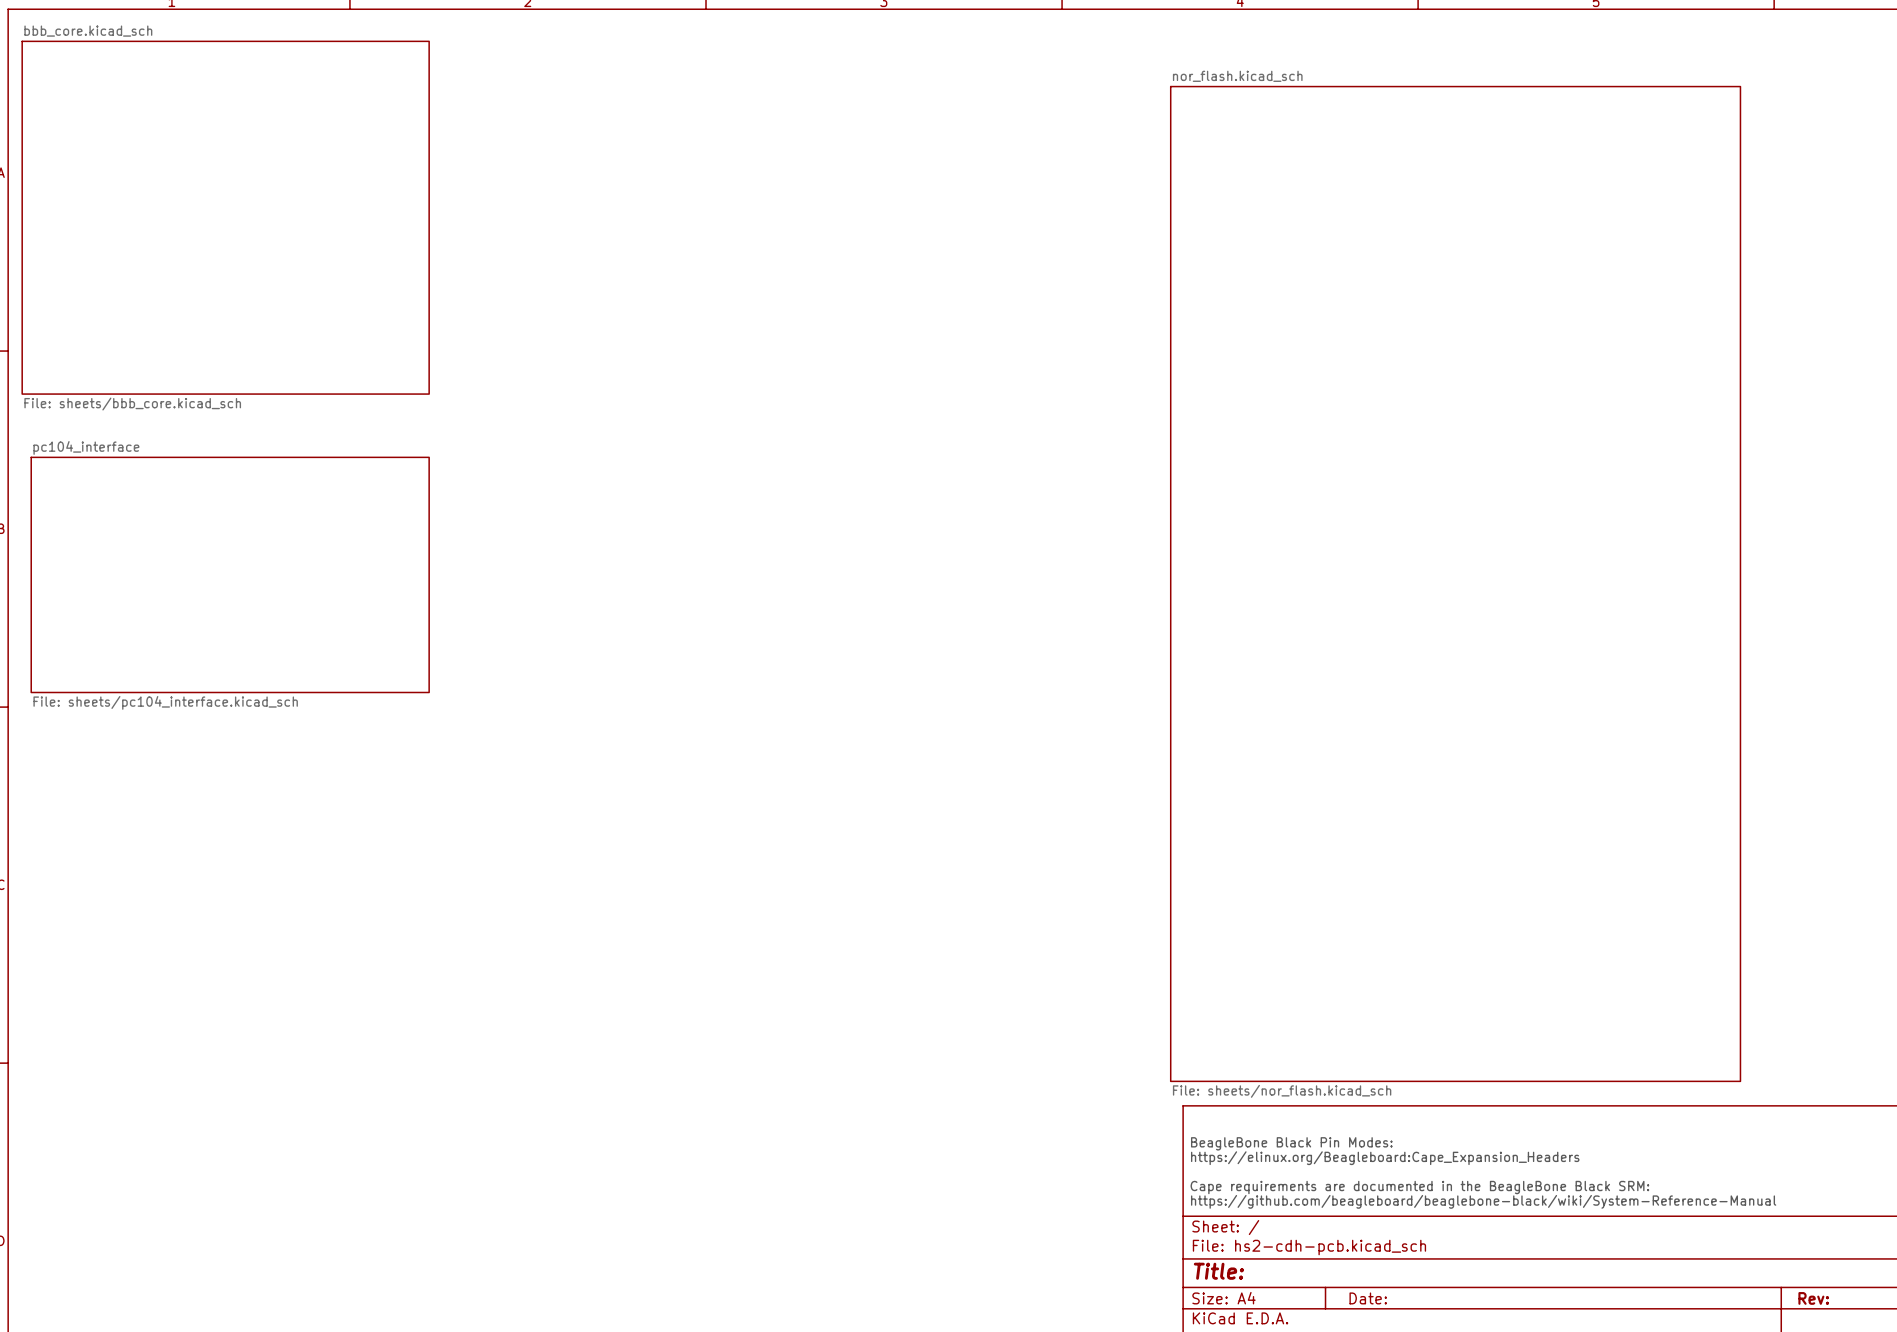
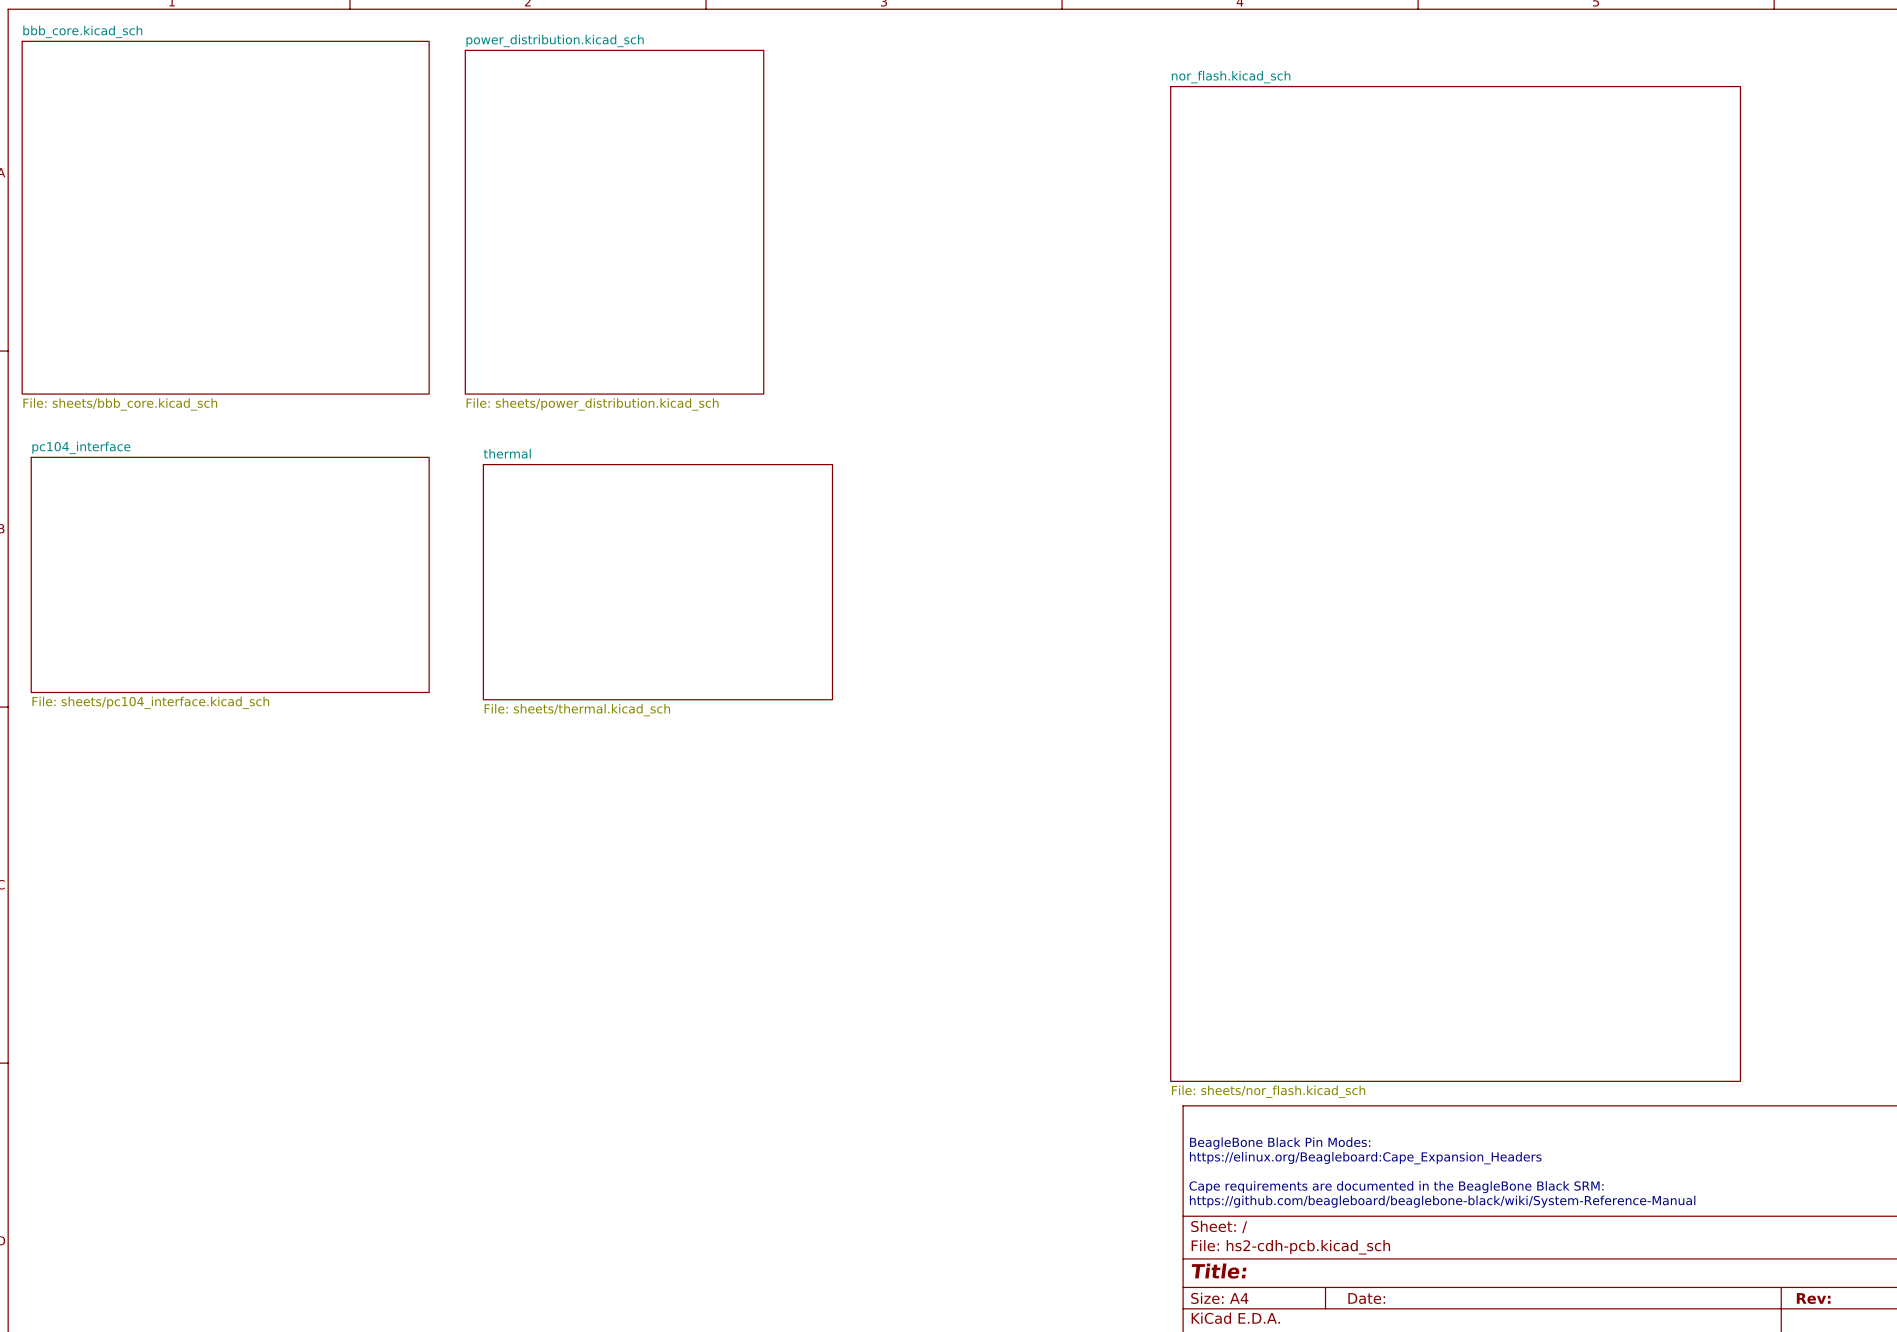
sheet power_distribution.kicad_sch: none -> File: sheets/power_distribution.kicad_sch (614, 222)
sheet thermal: none -> File: sheets/thermal.kicad_sch (657, 582)

